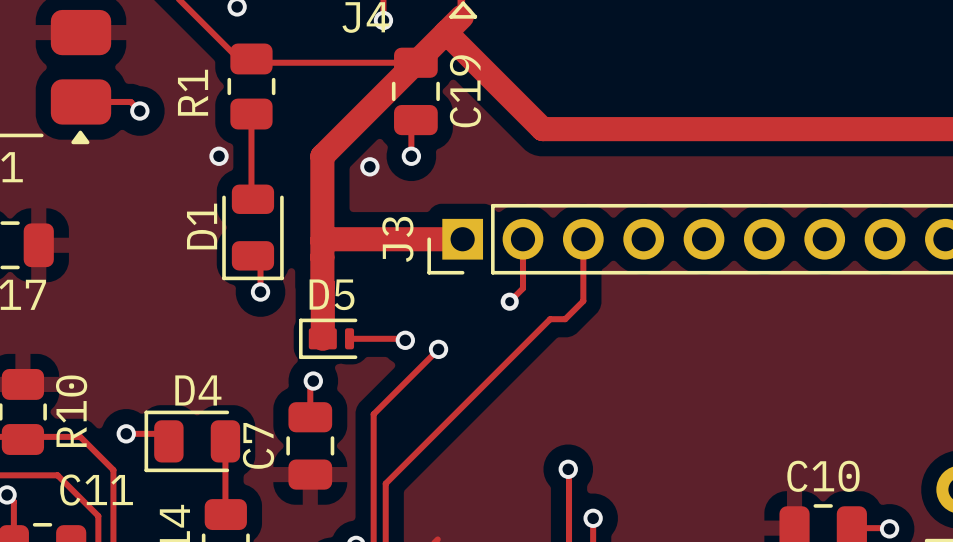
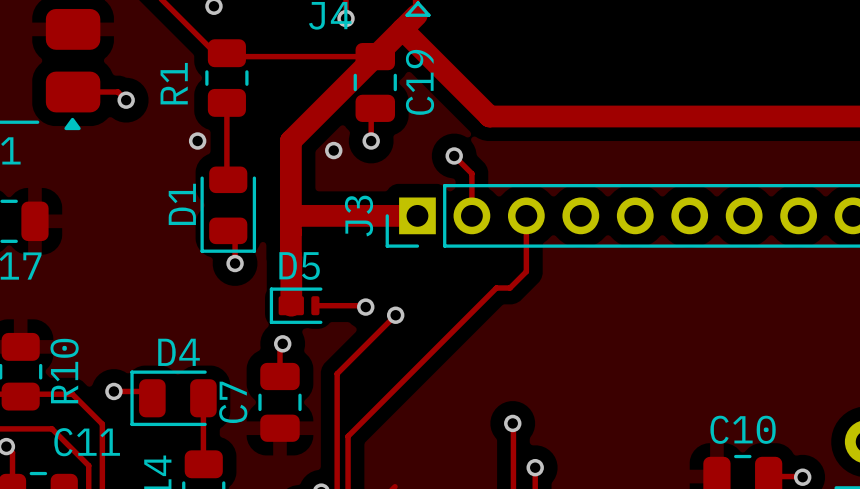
via: none -> (454, 155)
track: (523, 239) (523, 288) (509, 301) -> (471, 215) (471, 173) (452, 154)
via: (509, 301) -> none

